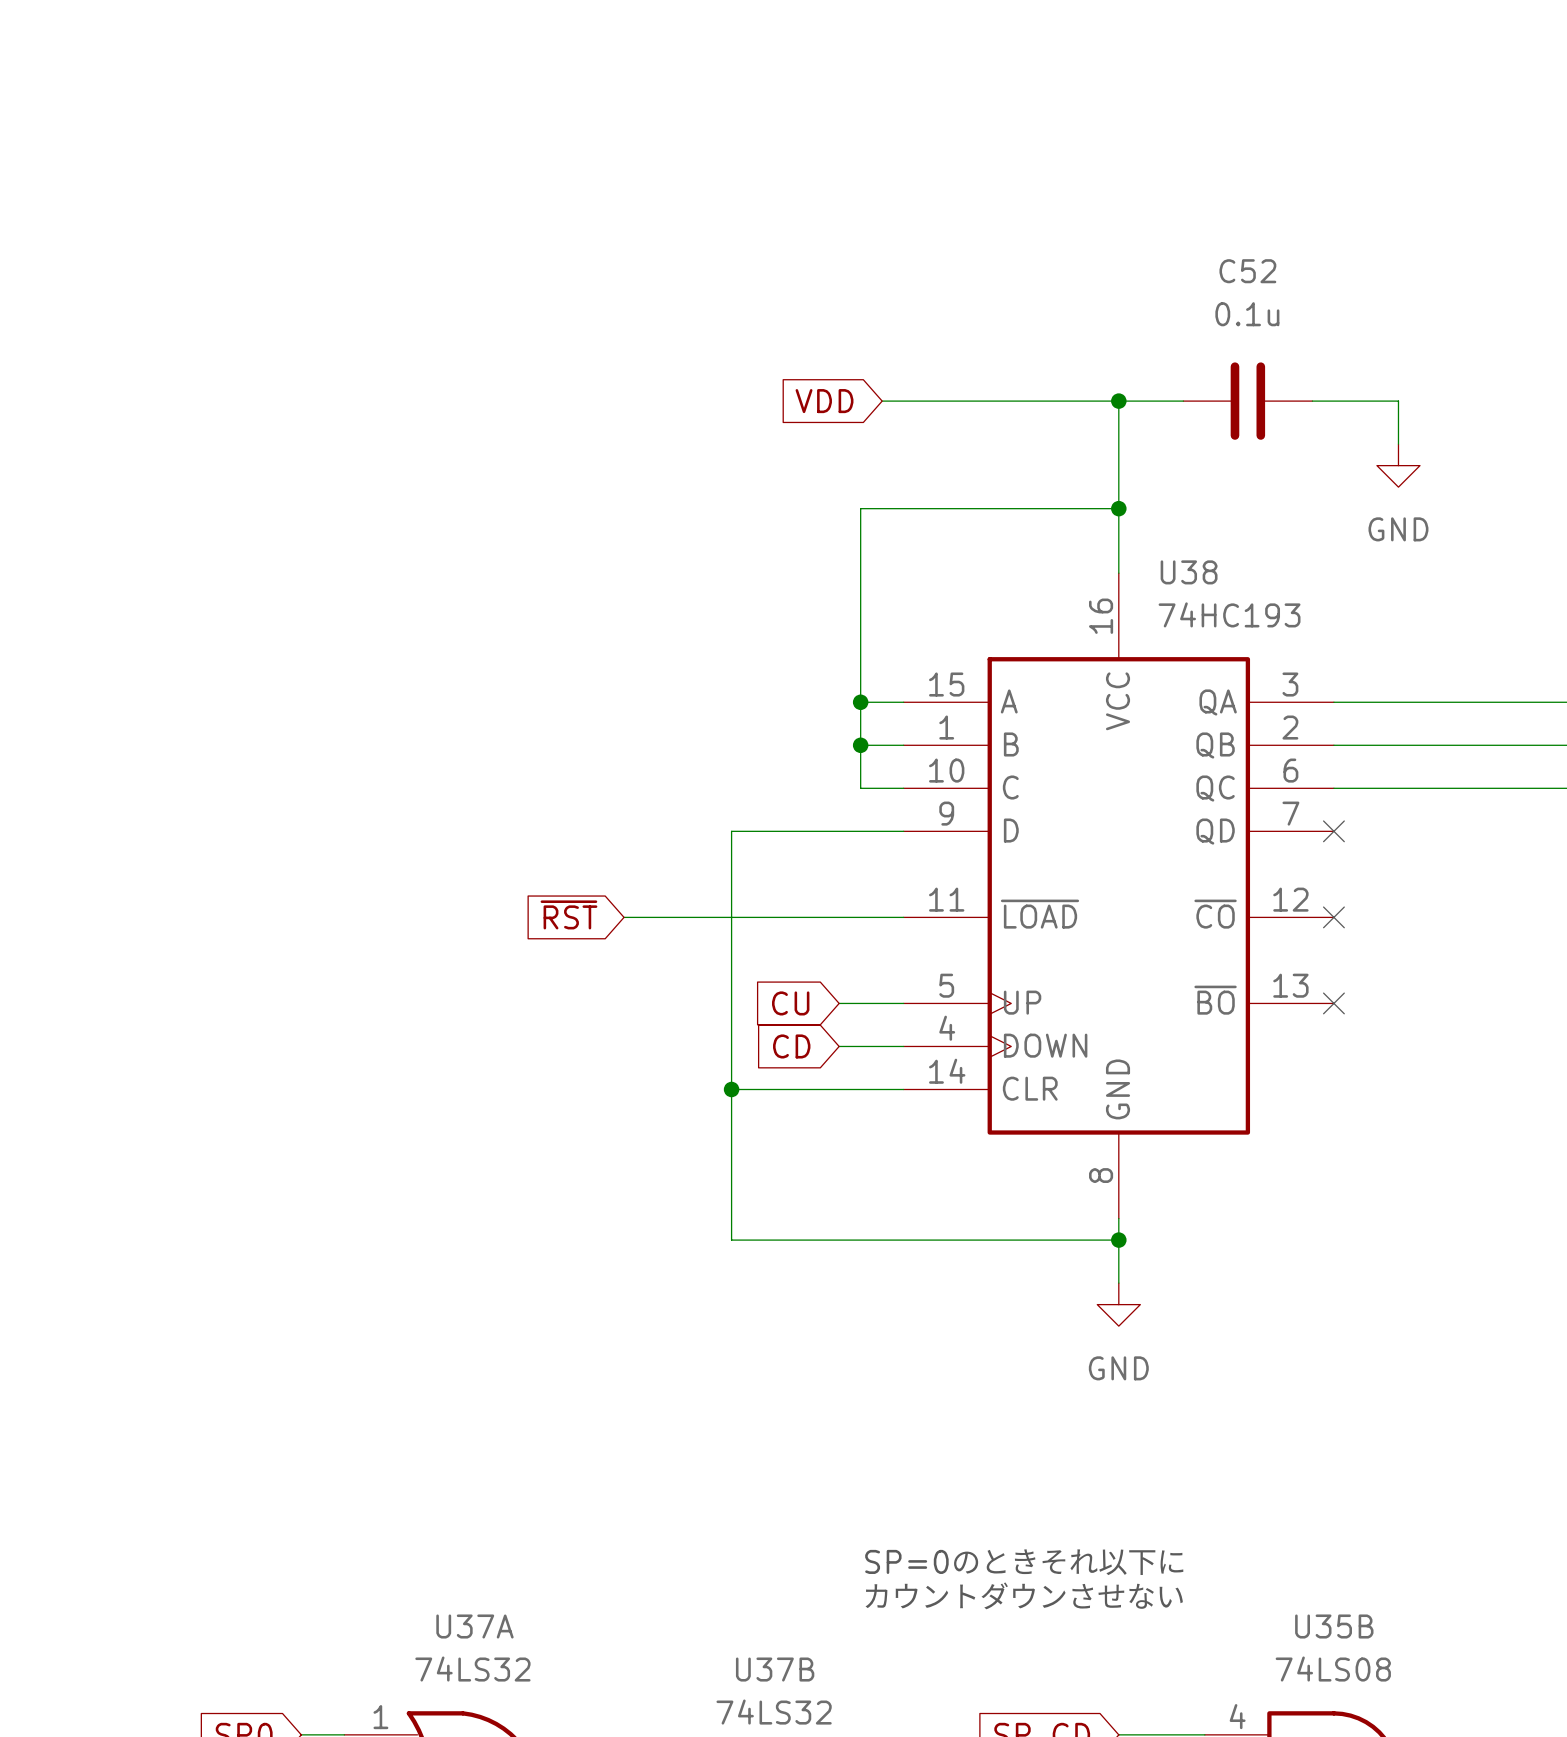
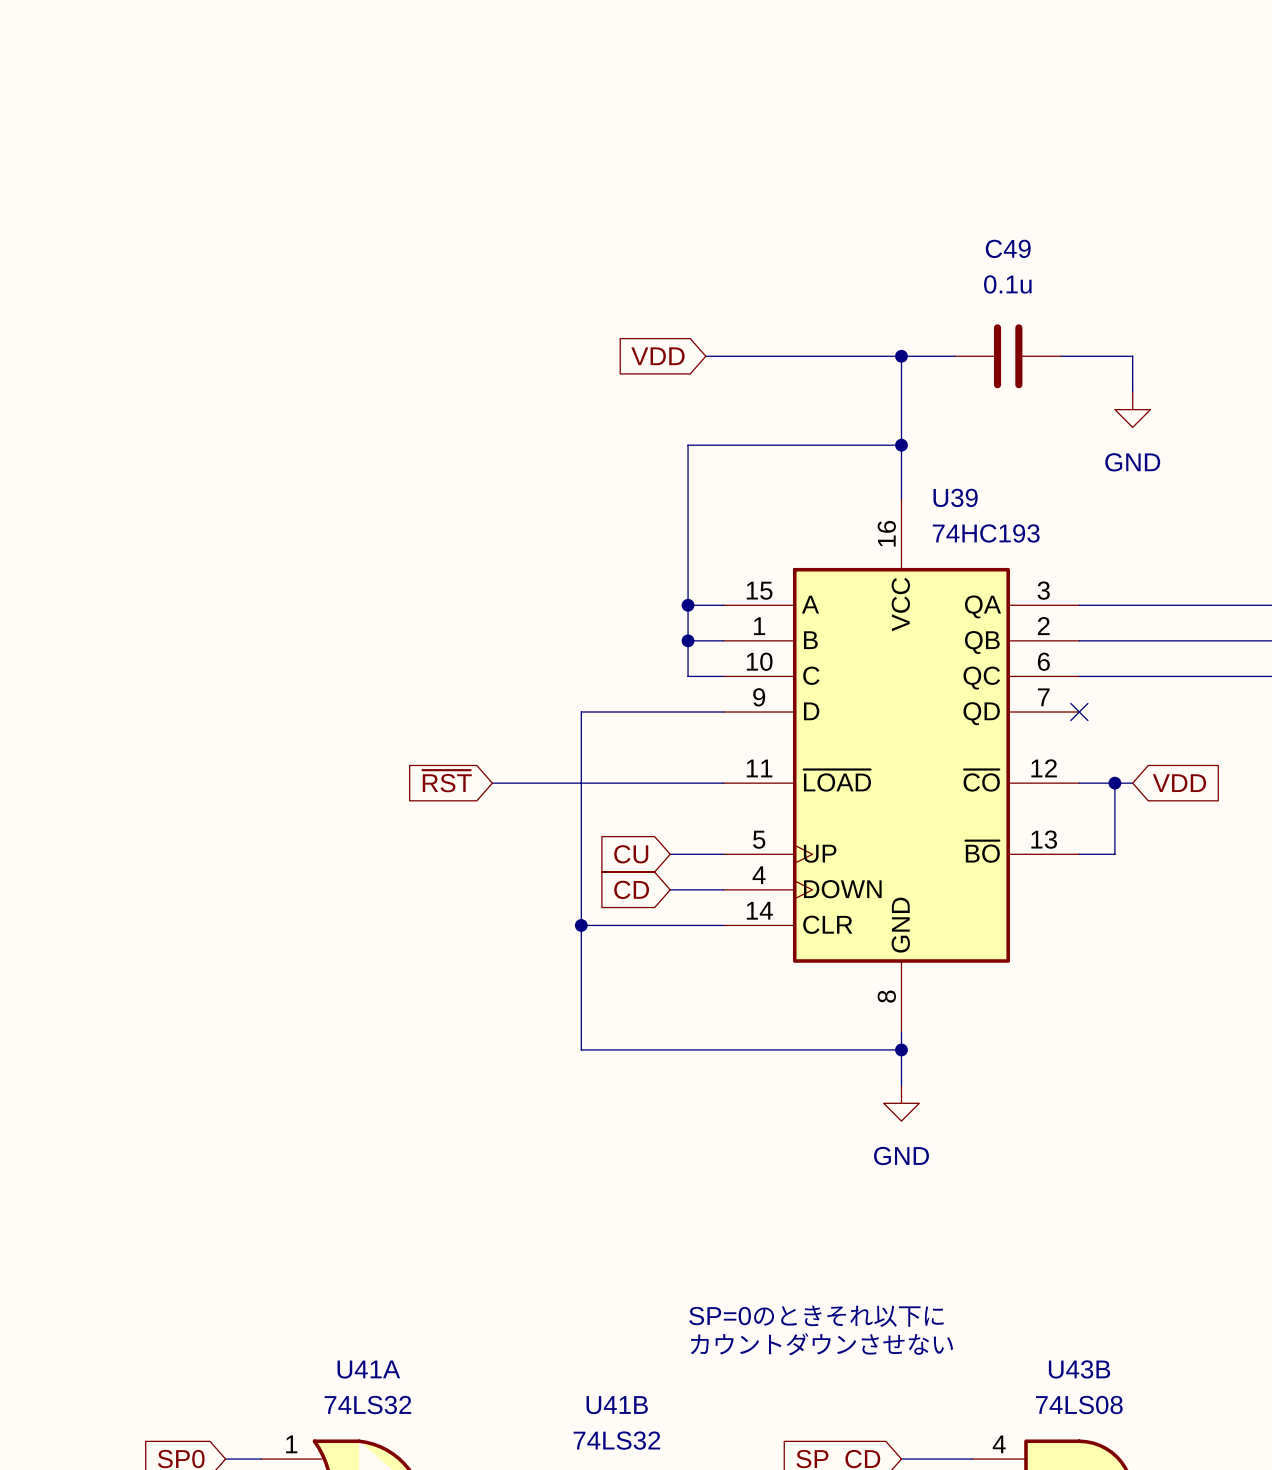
C52 name: C52 (1247, 271) -> C49 (1008, 248)
U38 name: U38 (1189, 572) -> U39 (955, 497)
wire: none -> (1079, 783) (1132, 783)
no-connect mark: (1333, 917) -> none
wire: none -> (1114, 783) (1114, 854) (1079, 854)
junction: none -> (1114, 783)
global label: none -> VDD (1179, 783)
no-connect mark: (1333, 1003) -> none
U37A name: U37A (474, 1626) -> U41A (368, 1369)
U35B name: U35B (1334, 1626) -> U43B (1079, 1369)
U37B name: U37B (775, 1669) -> U41B (617, 1405)

